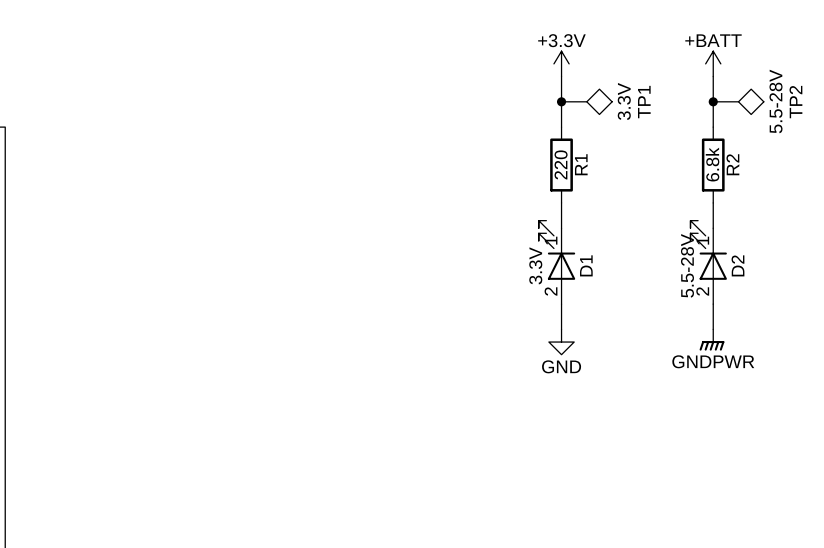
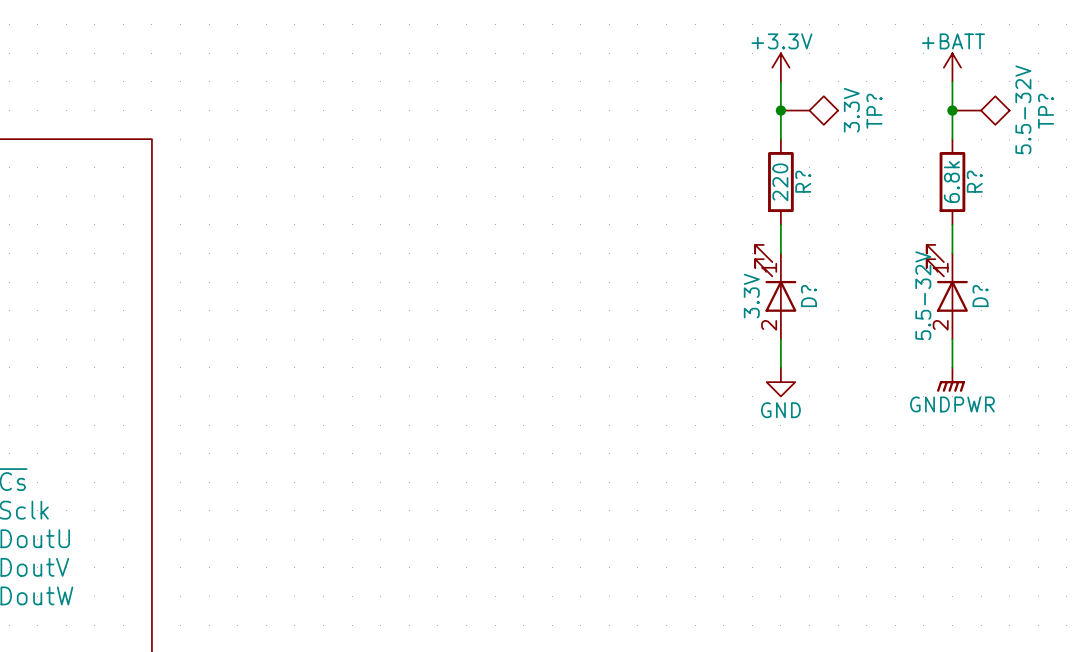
TP2 value: 5.5-28V (775, 101) -> 5.5-32V (1023, 109)
TP1 name: TP1 (644, 102) -> TP? (874, 111)
TP2 name: TP2 (795, 102) -> TP? (1046, 111)
R1 name: R1 (581, 164) -> R? (803, 181)
R2 name: R2 (732, 164) -> R? (974, 181)
D1 name: D1 (586, 265) -> D? (808, 296)
D2 value: 5.5-28V (687, 265) -> 5.5-32V (923, 295)
D2 name: D2 (737, 265) -> D? (980, 296)

